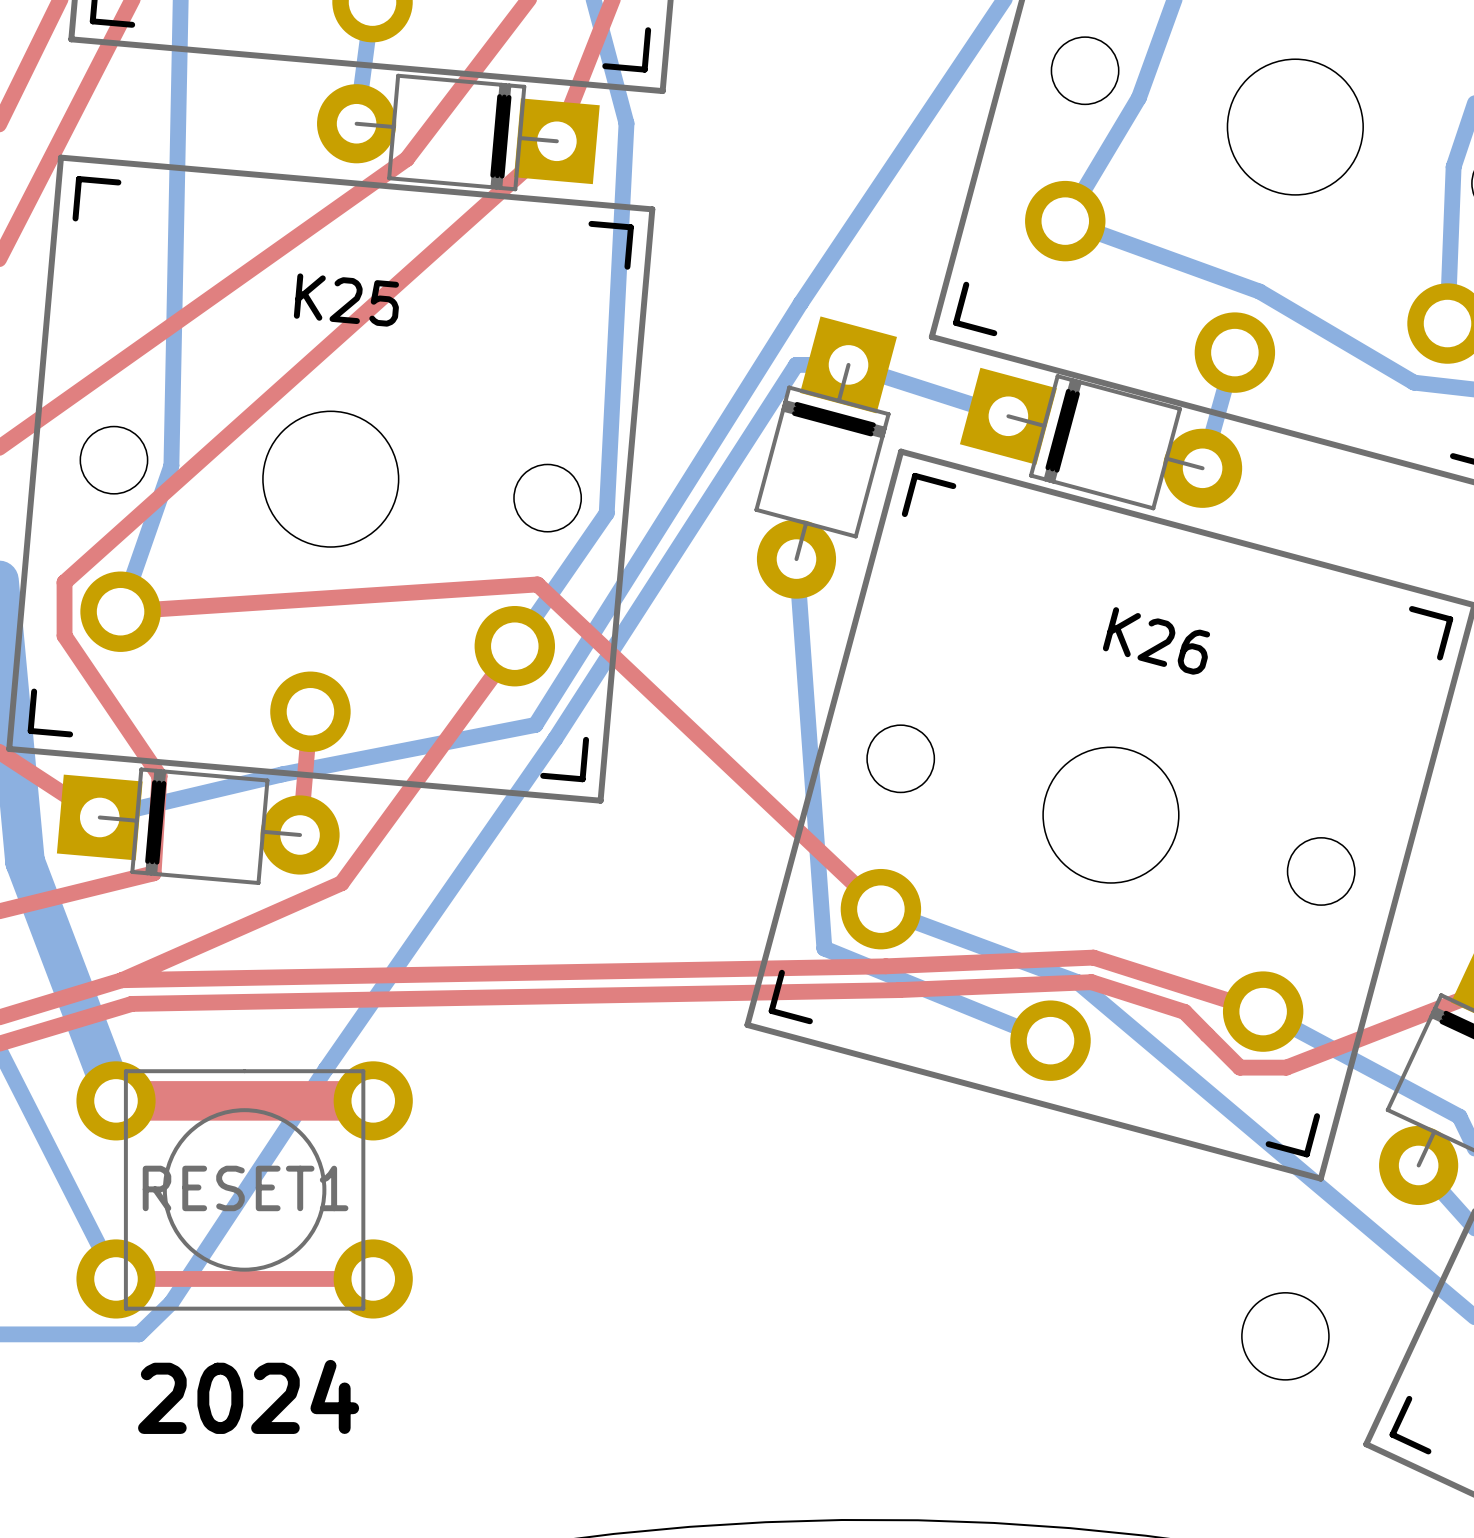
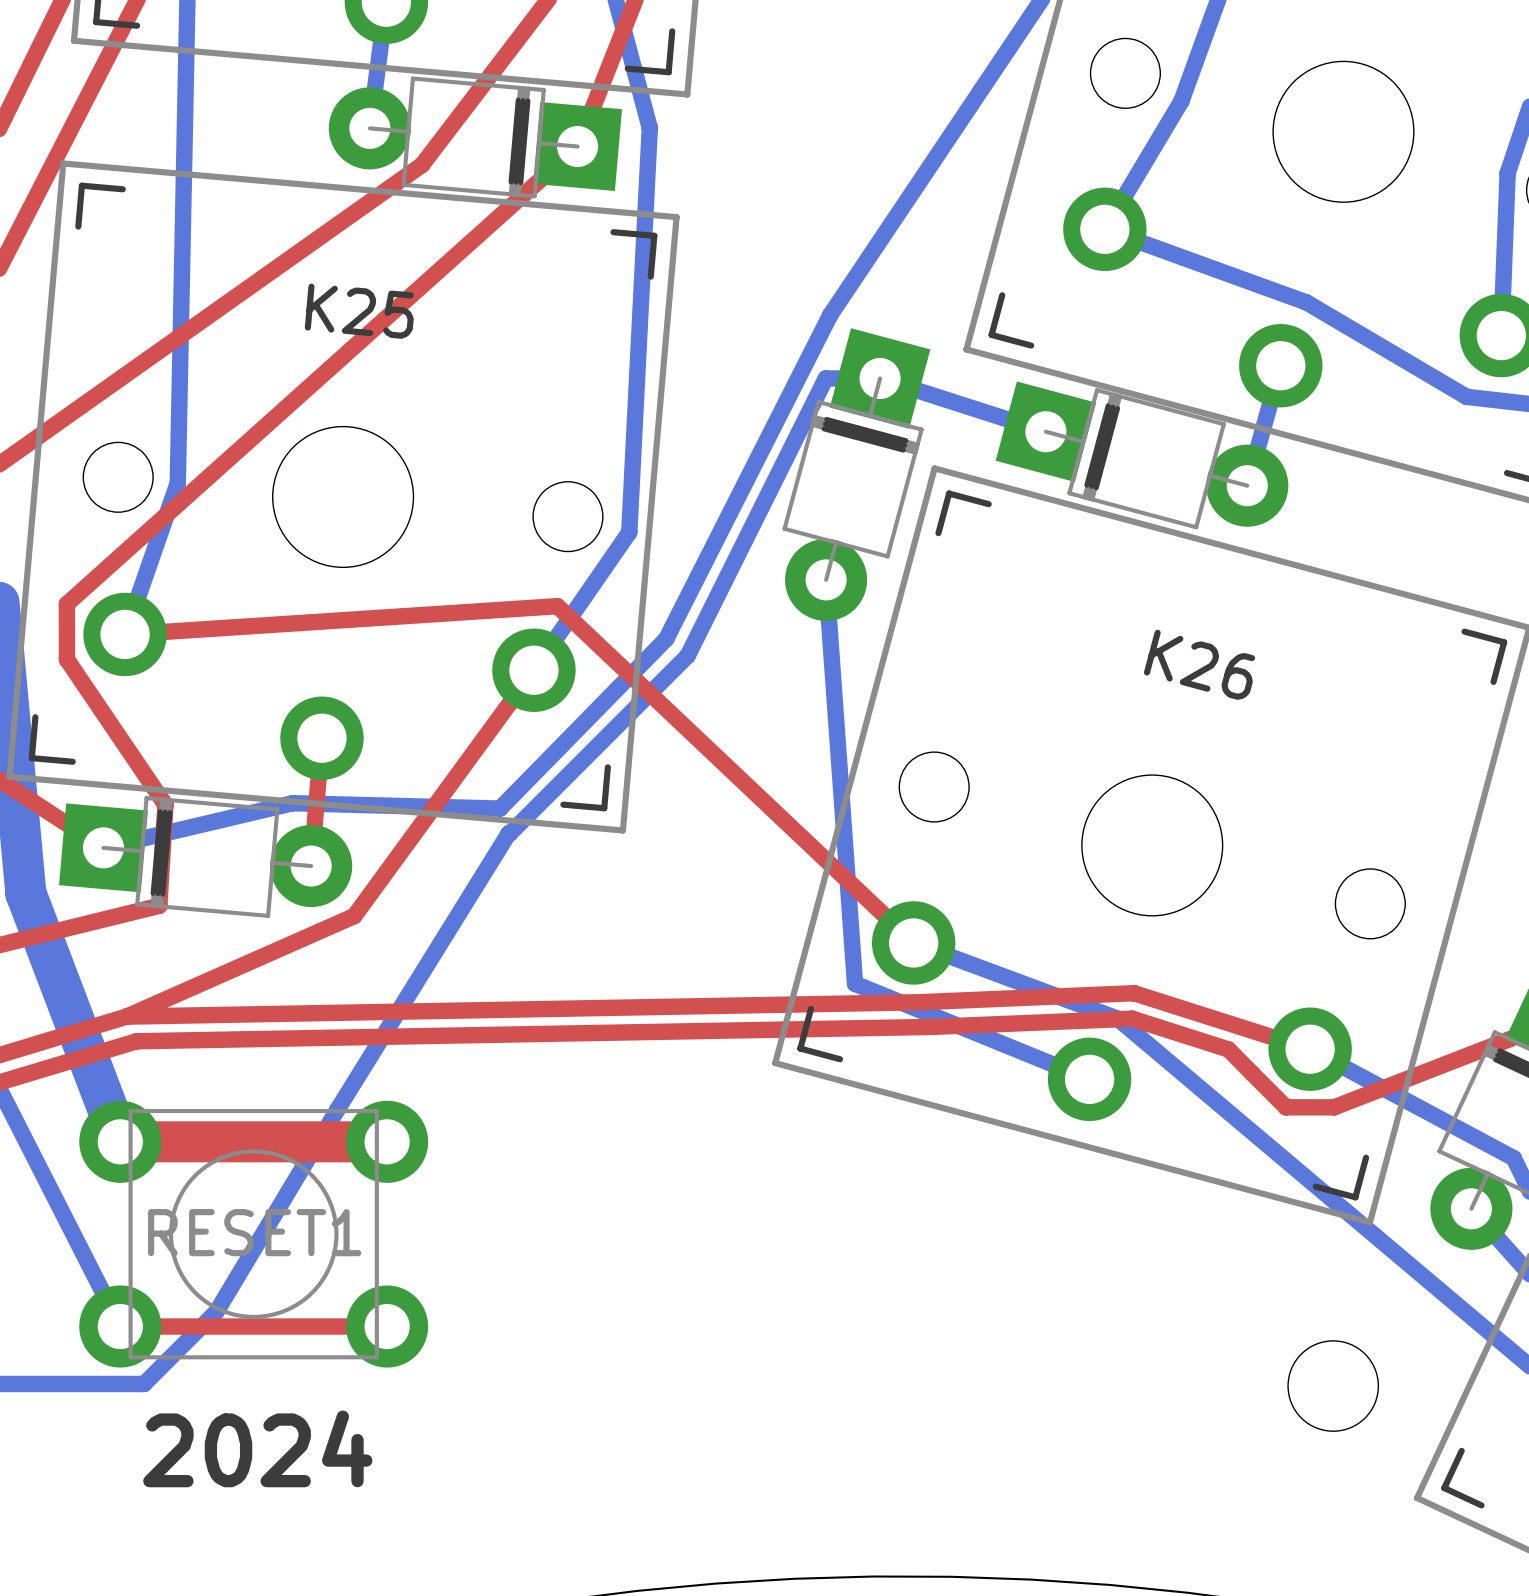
bottom track: (800, 303) (535, 724) (282, 774) -> (830, 314) (666, 639) (499, 808) (292, 803)
bottom track: (796, 364) (555, 738) (325, 1069) (171, 1302) (138, 1334) -> (825, 378) (687, 655) (508, 833) (337, 1108) (216, 1311) (144, 1383)

